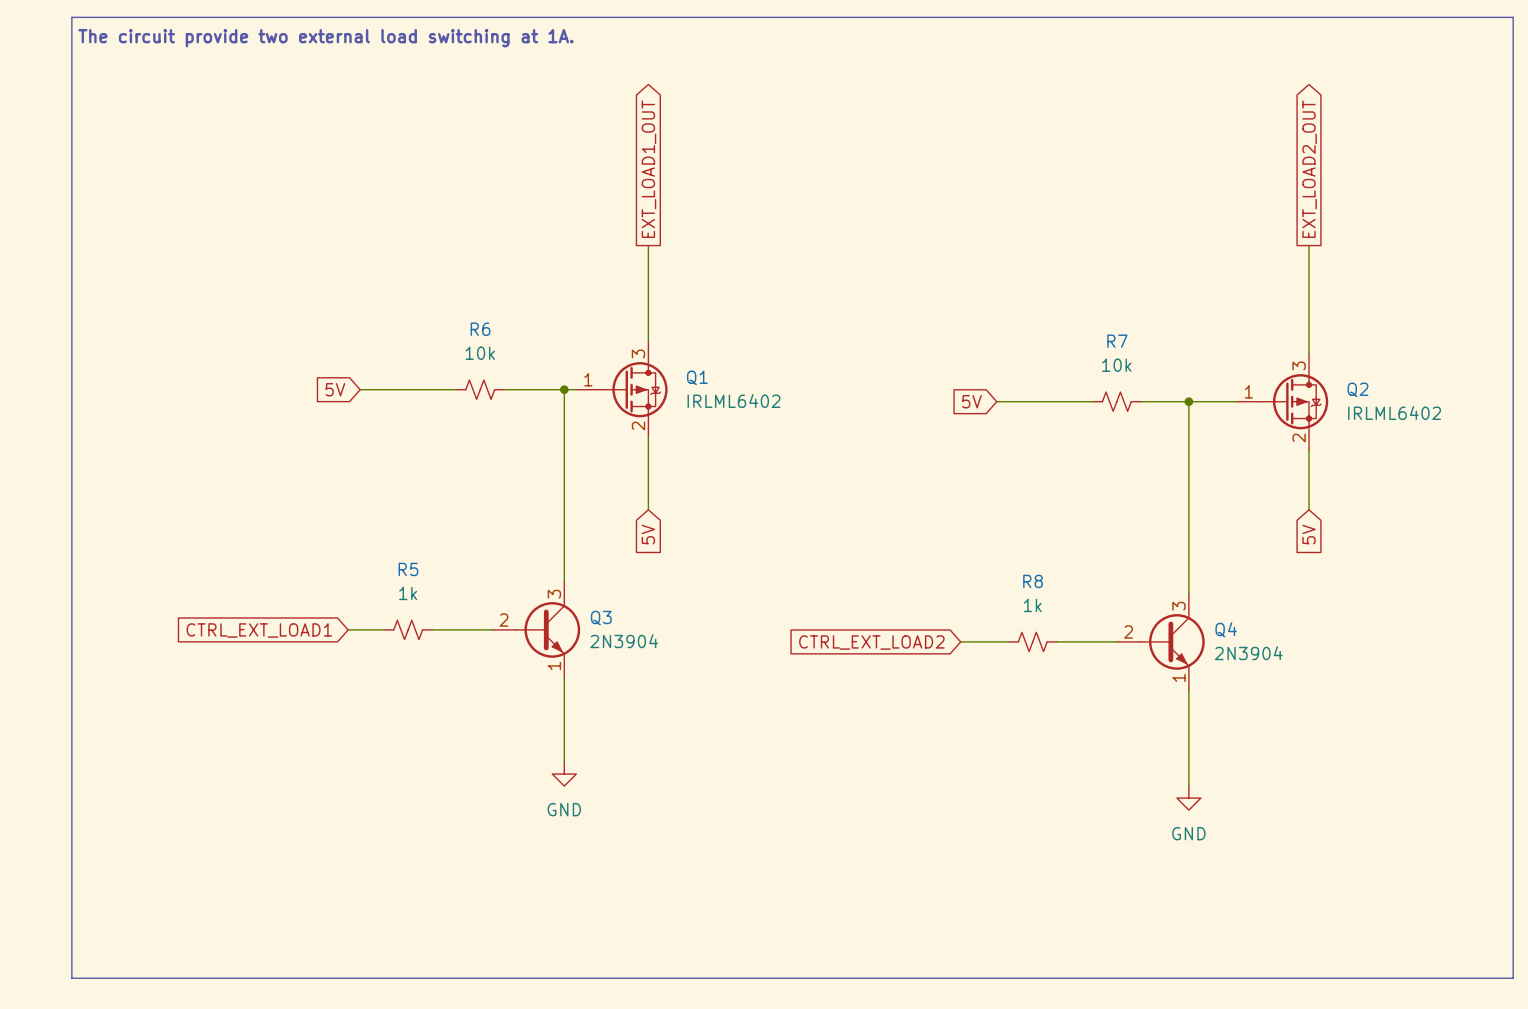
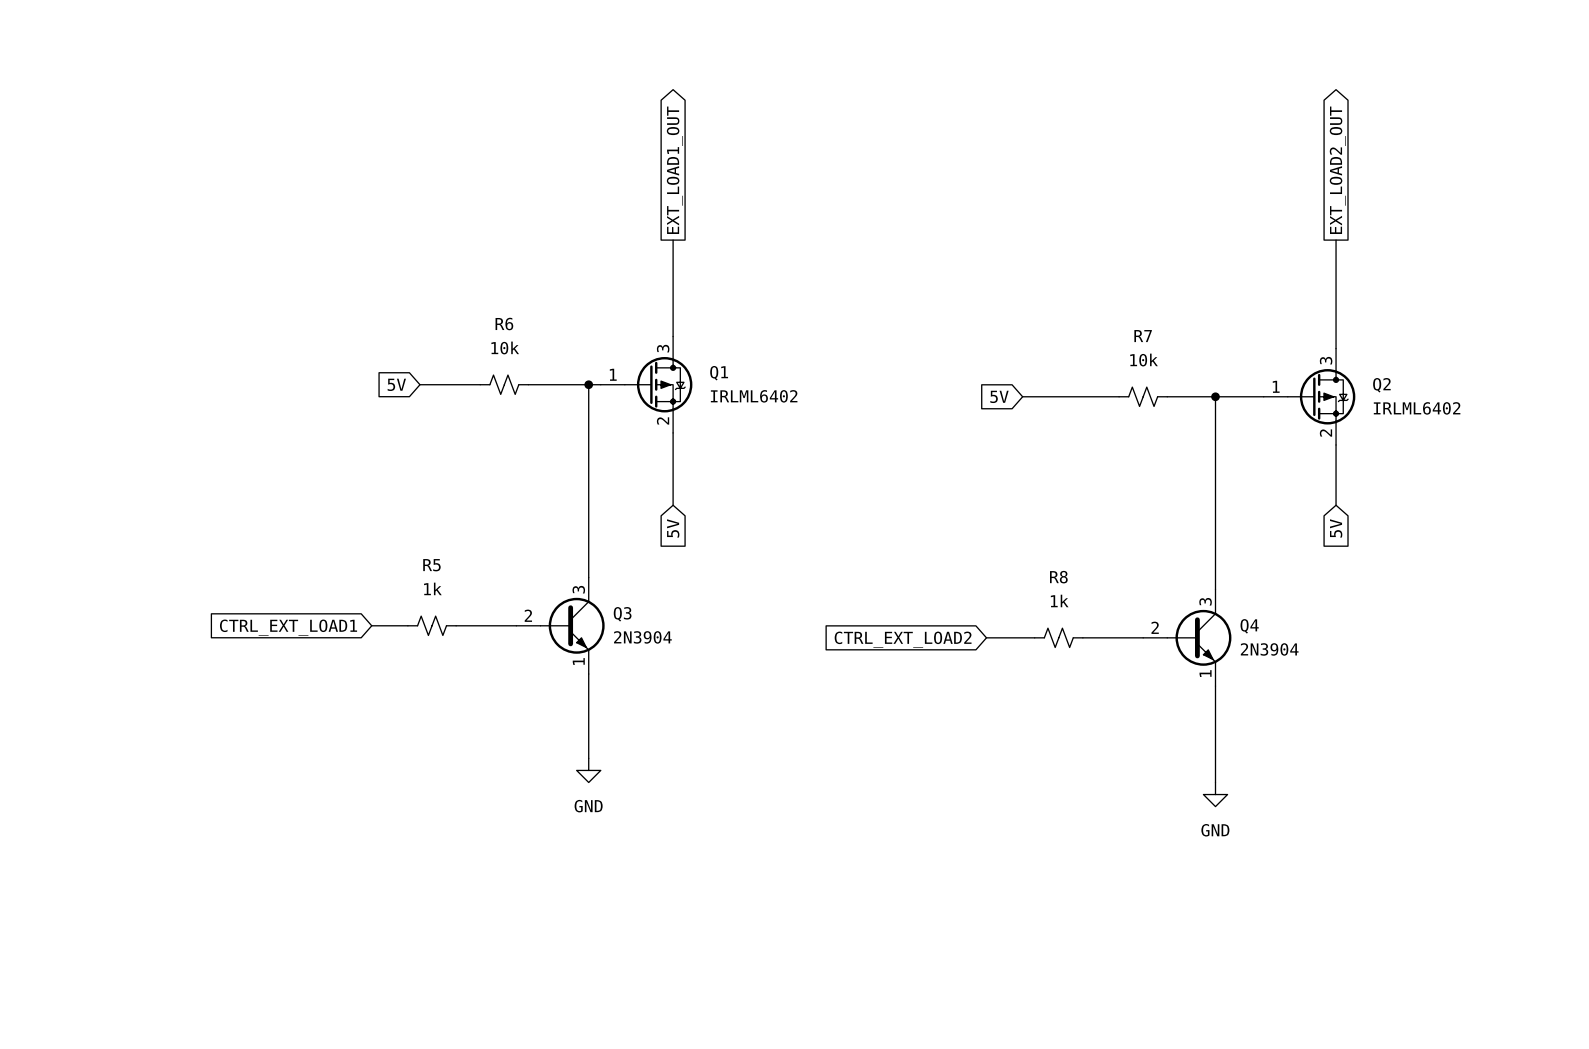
line: (71, 17) (1513, 17) (1513, 978) (71, 978) (71, 17) -> none
text: The circuit provide two external load switching at 1A. (325, 38) -> none
global label position: 5V (335, 389) -> 5V (396, 384)
wire: (360, 389) (396, 389) -> none

